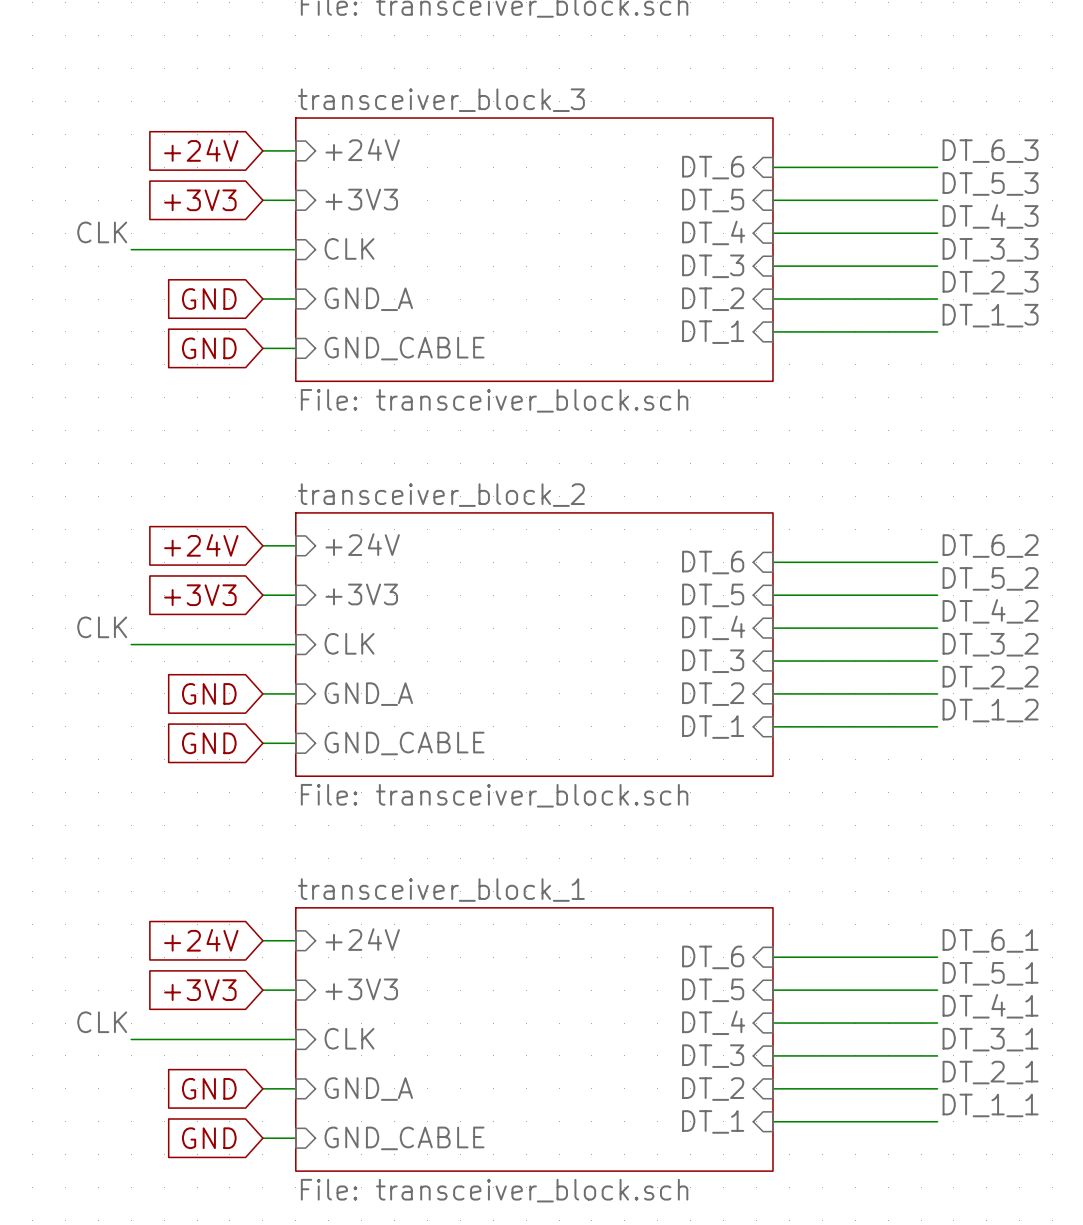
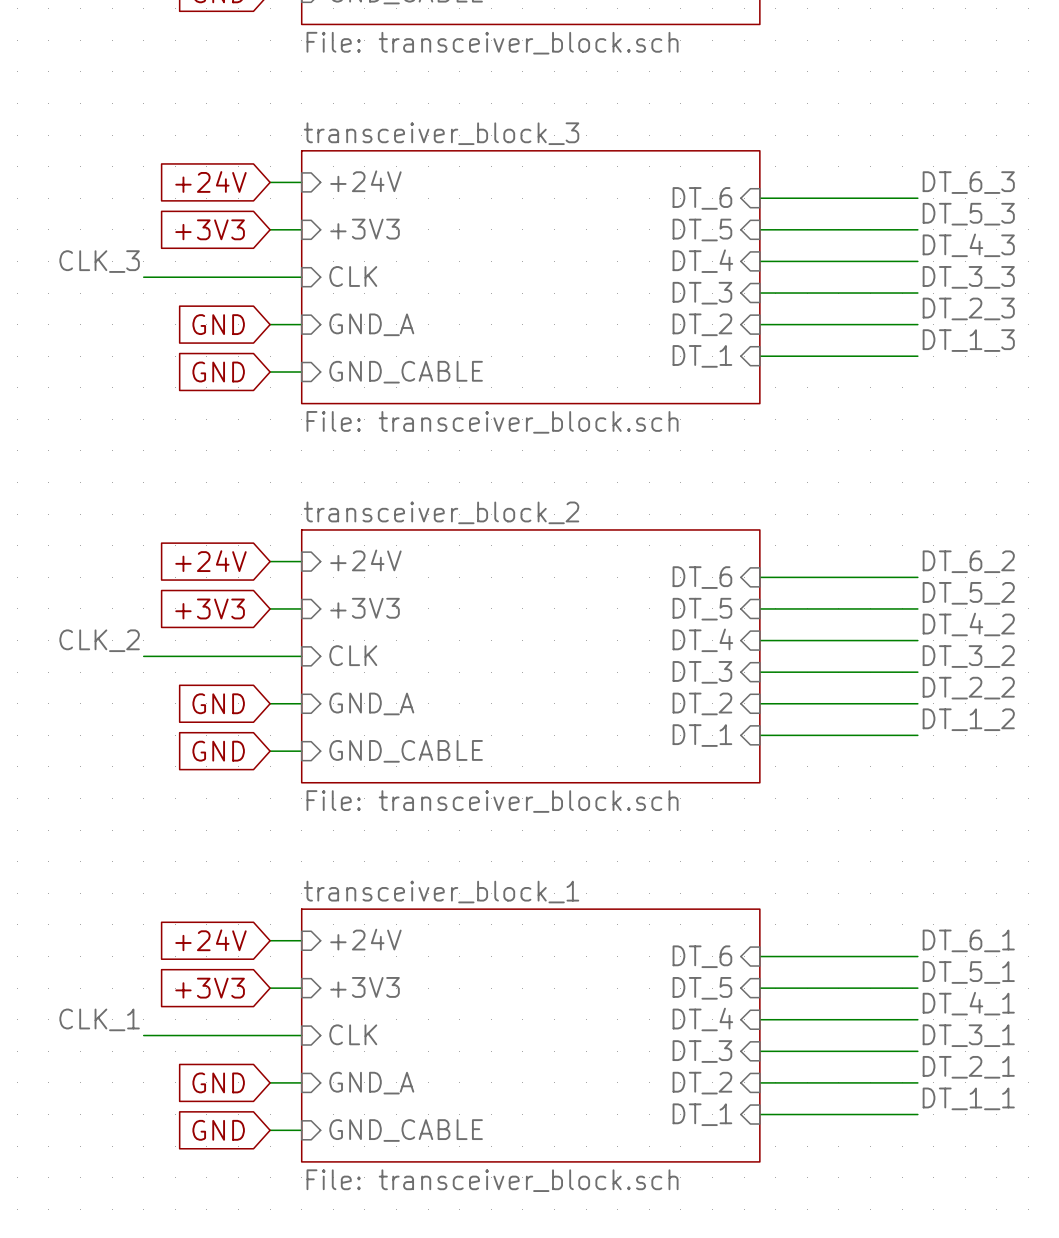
label: CLK (102, 232) -> CLK_3 (99, 261)
label: CLK (102, 627) -> CLK_2 (99, 640)
label: CLK (102, 1022) -> CLK_1 (99, 1019)

